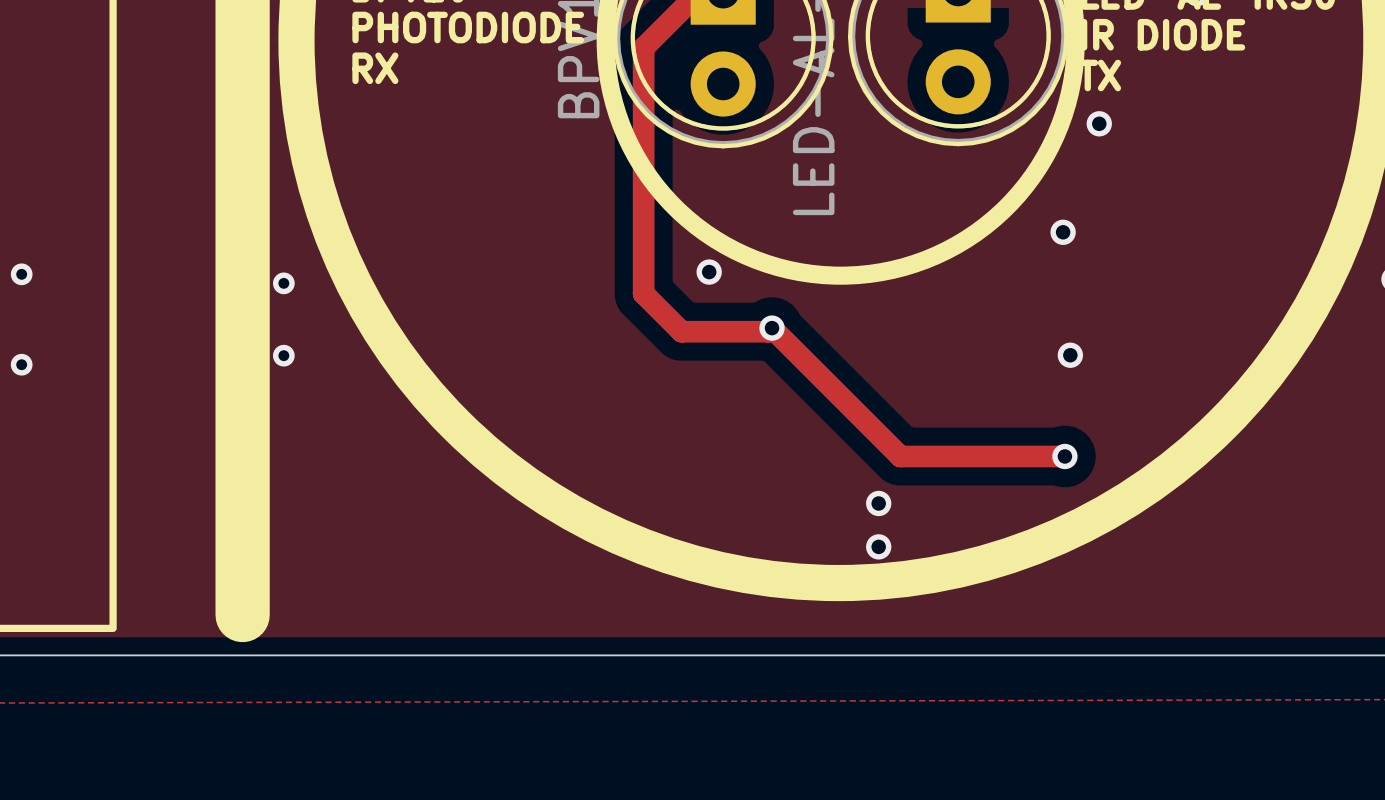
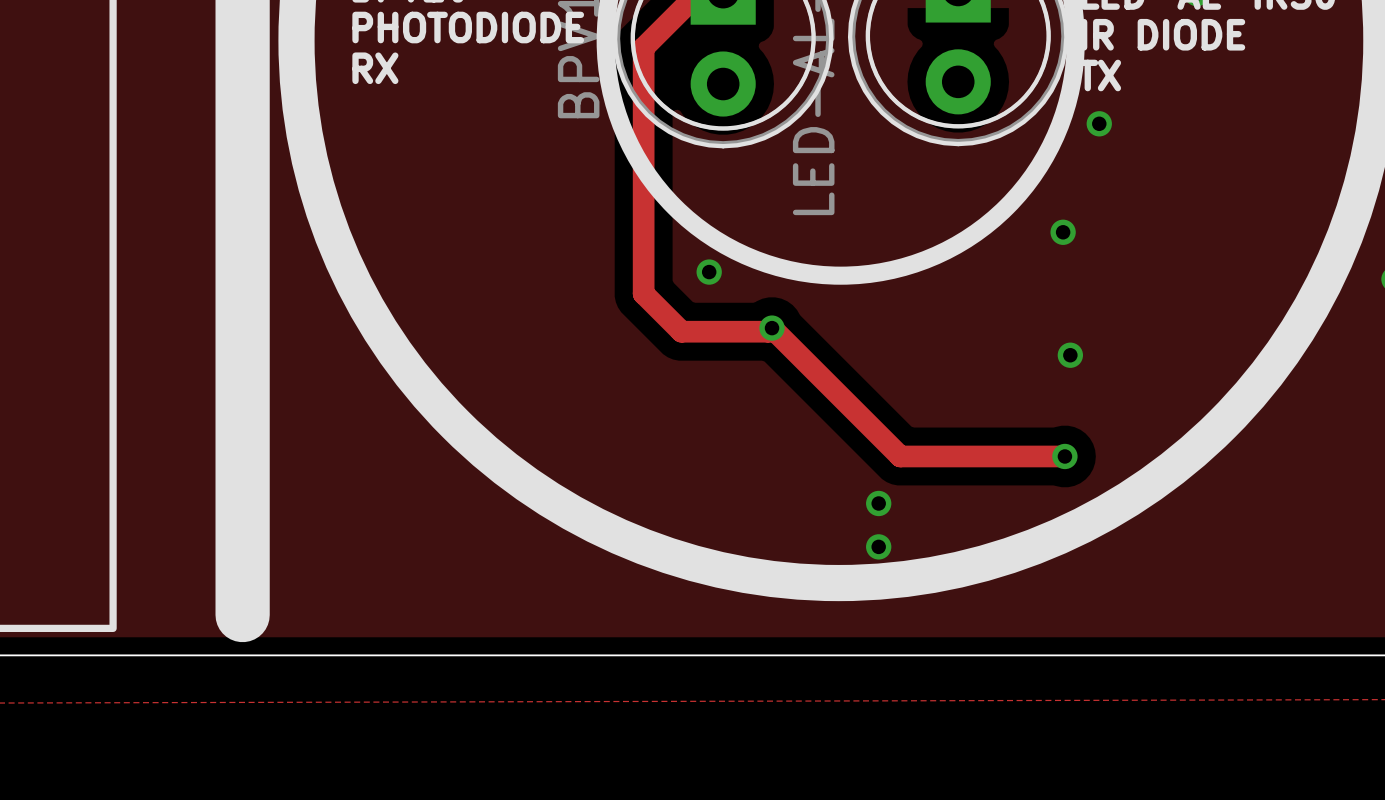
via: (21, 274) -> none
via: (283, 283) -> none
via: (283, 355) -> none
via: (21, 364) -> none

